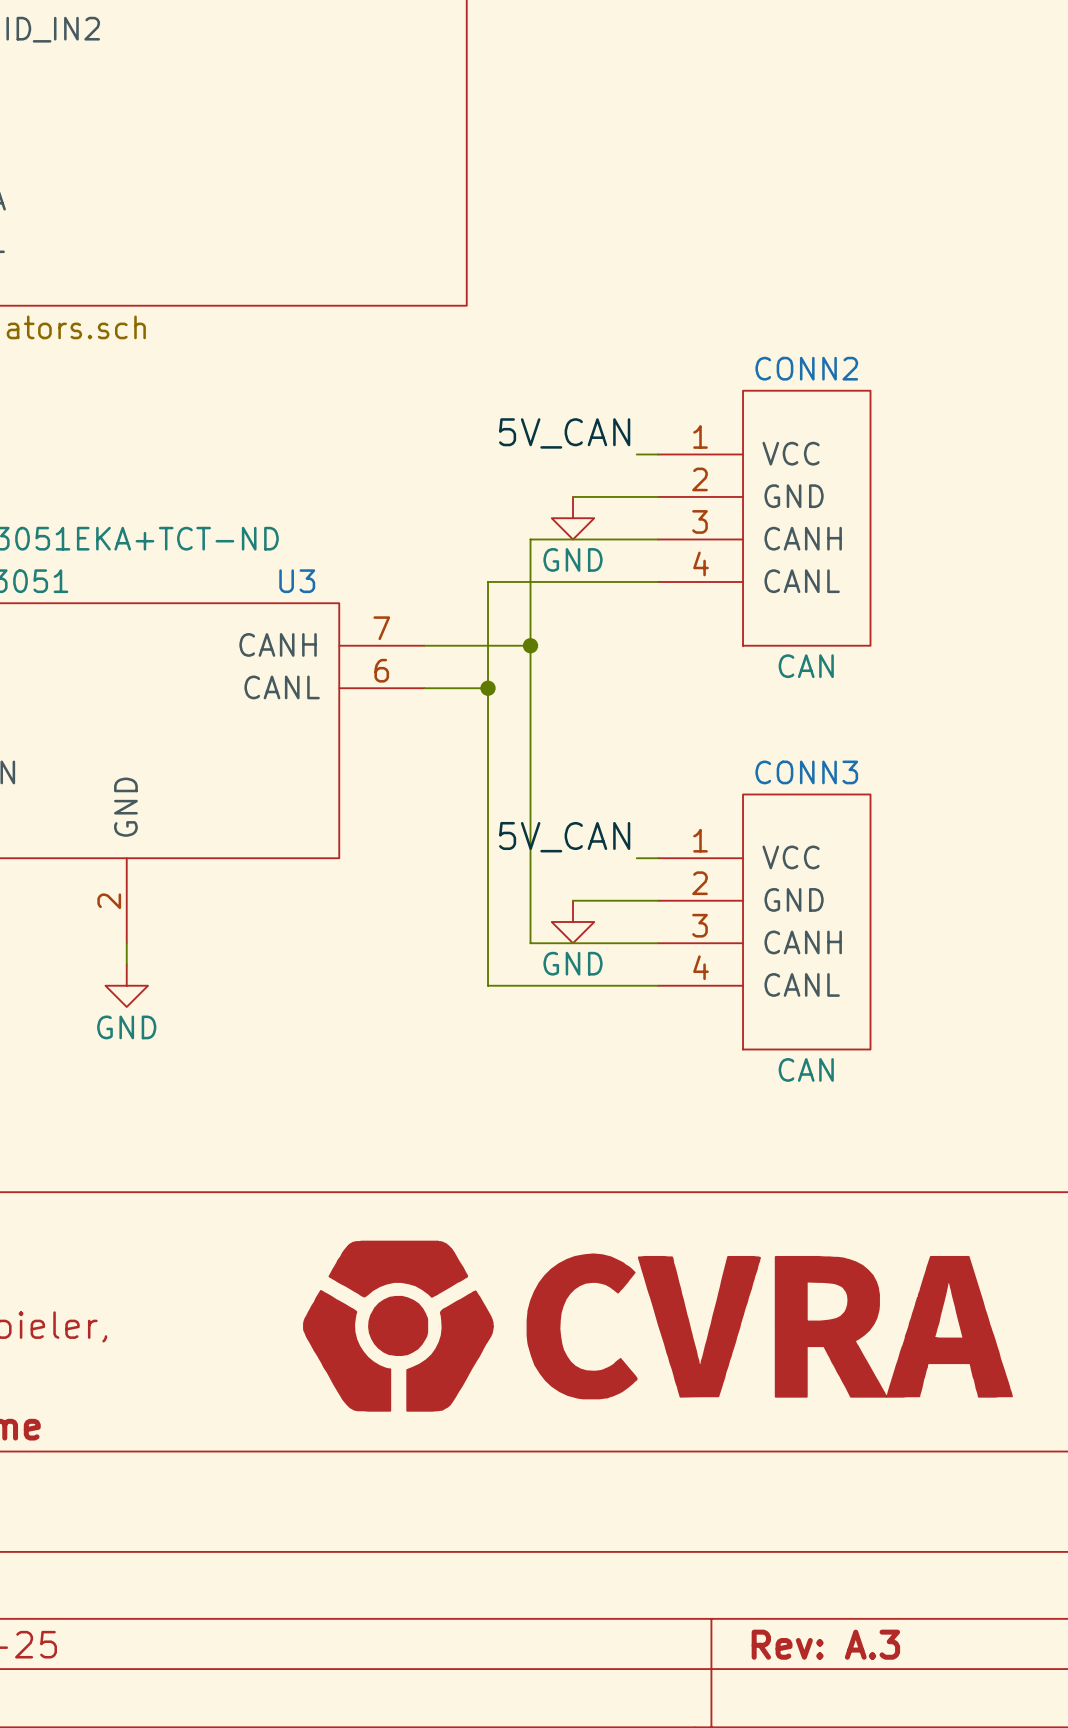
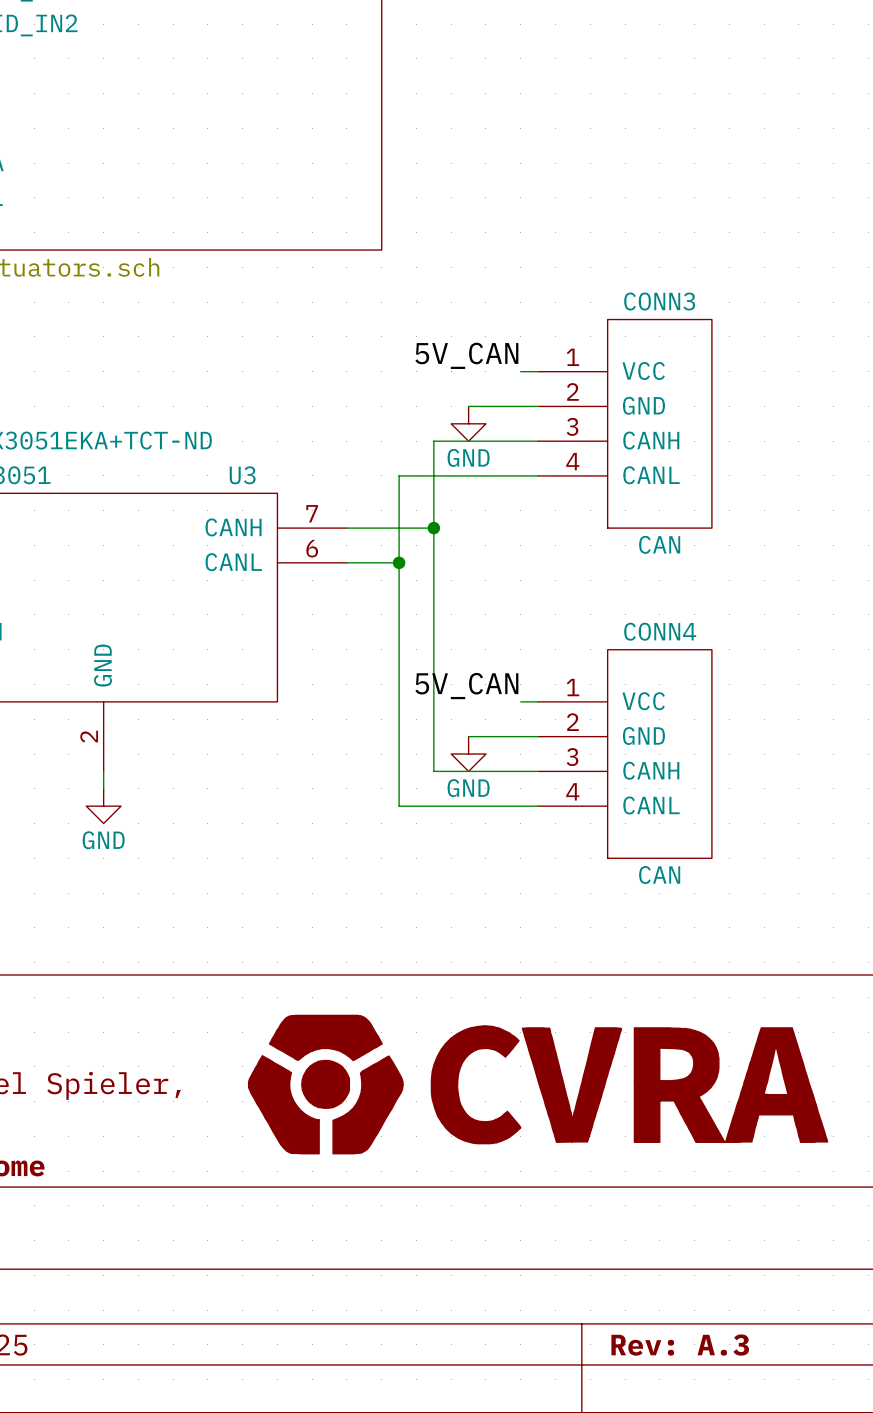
CONN2 name: CONN2 (806, 368) -> CONN3 (659, 301)
CONN3 name: CONN3 (806, 772) -> CONN4 (660, 631)

